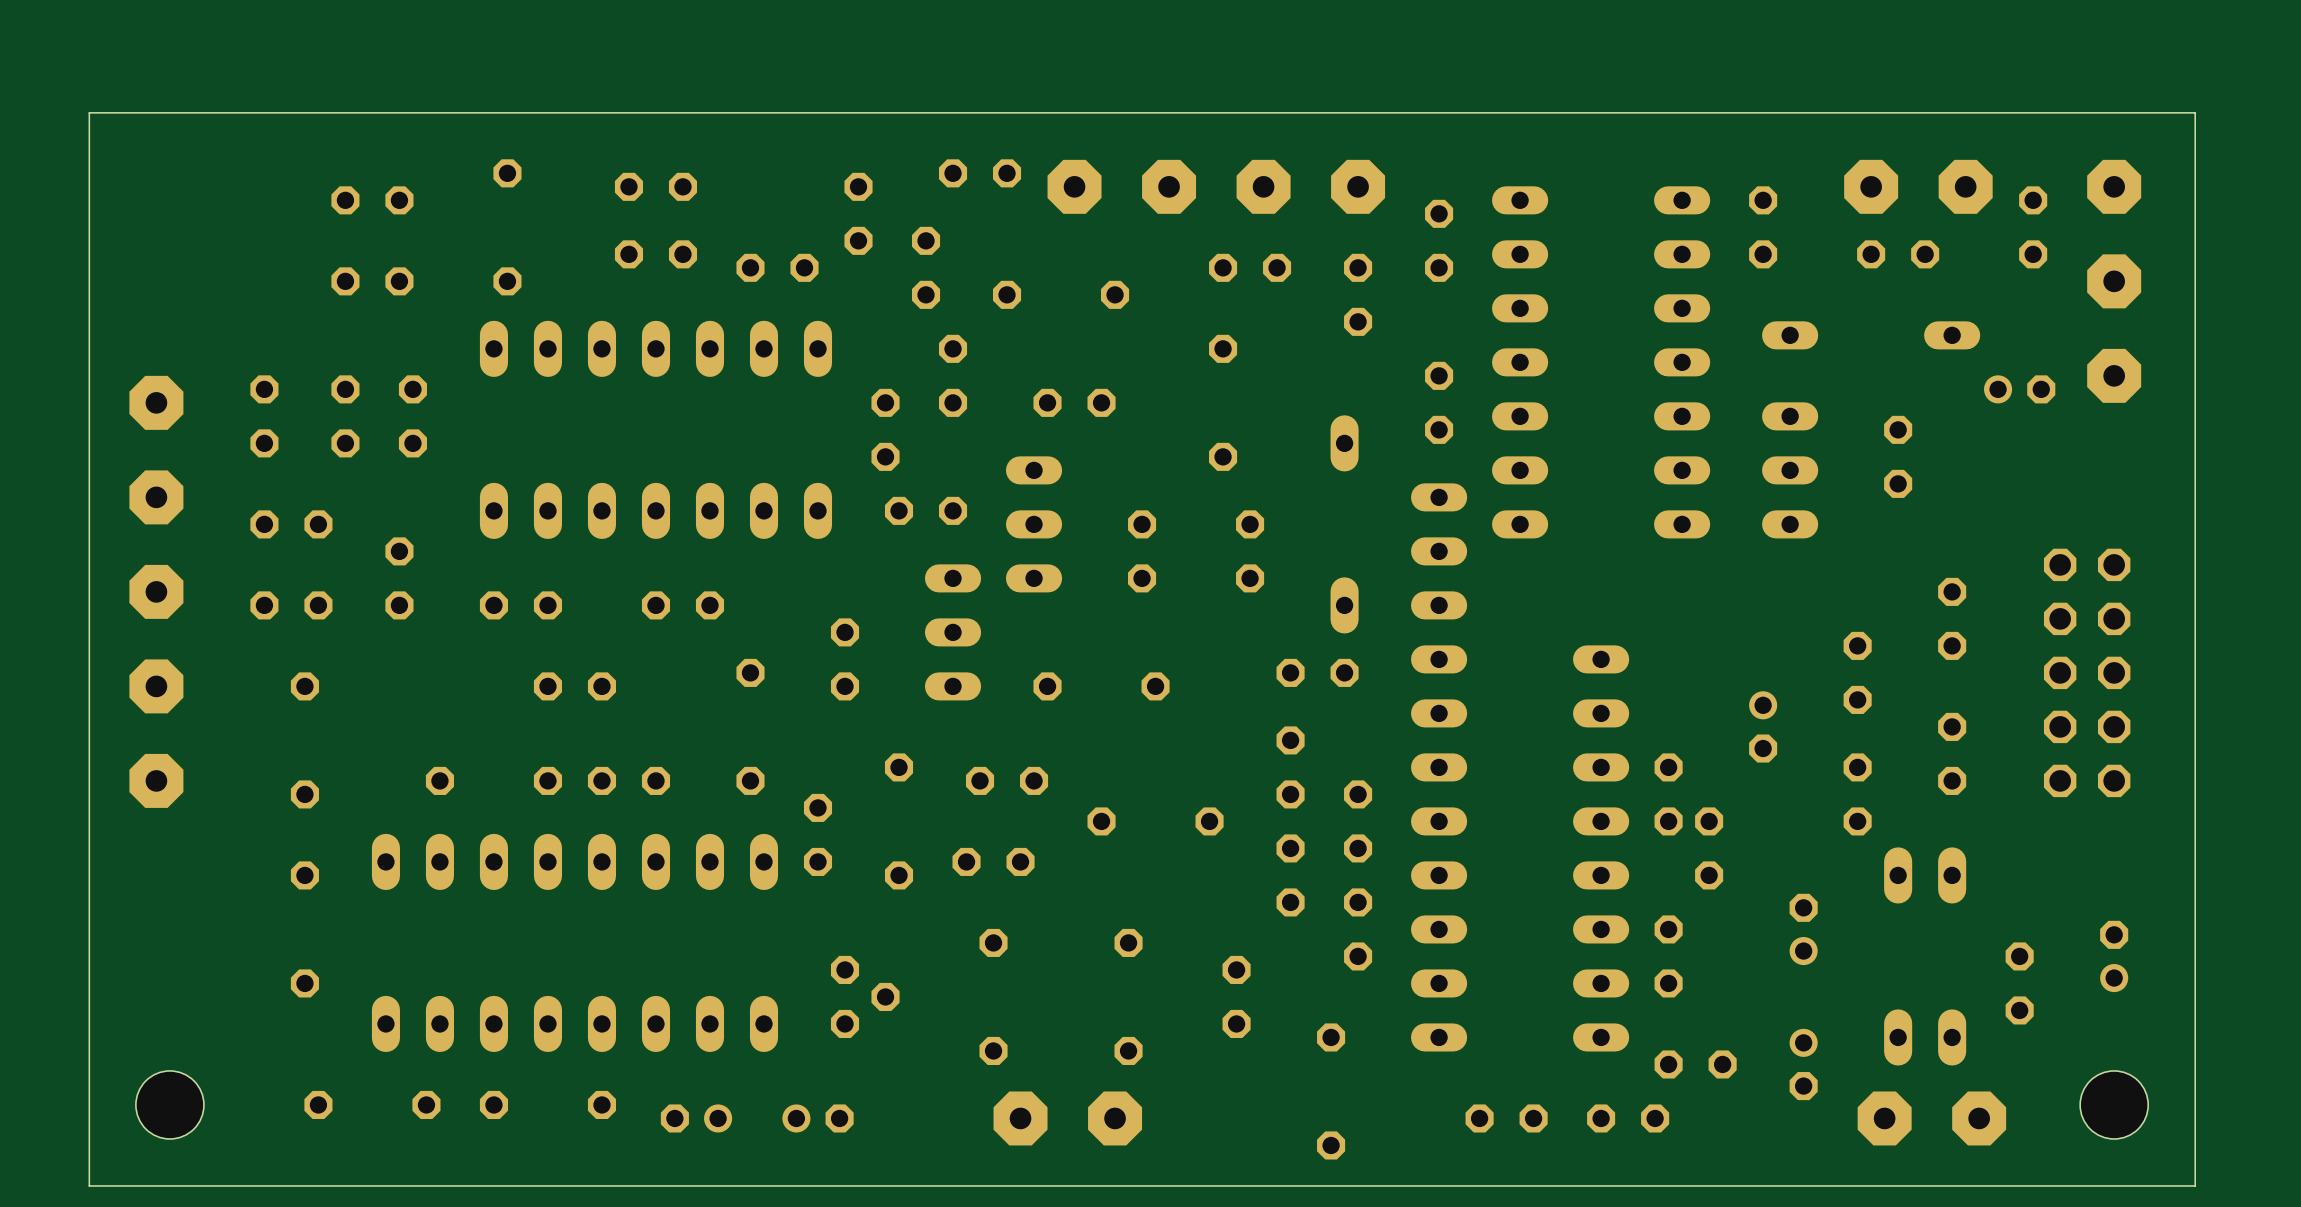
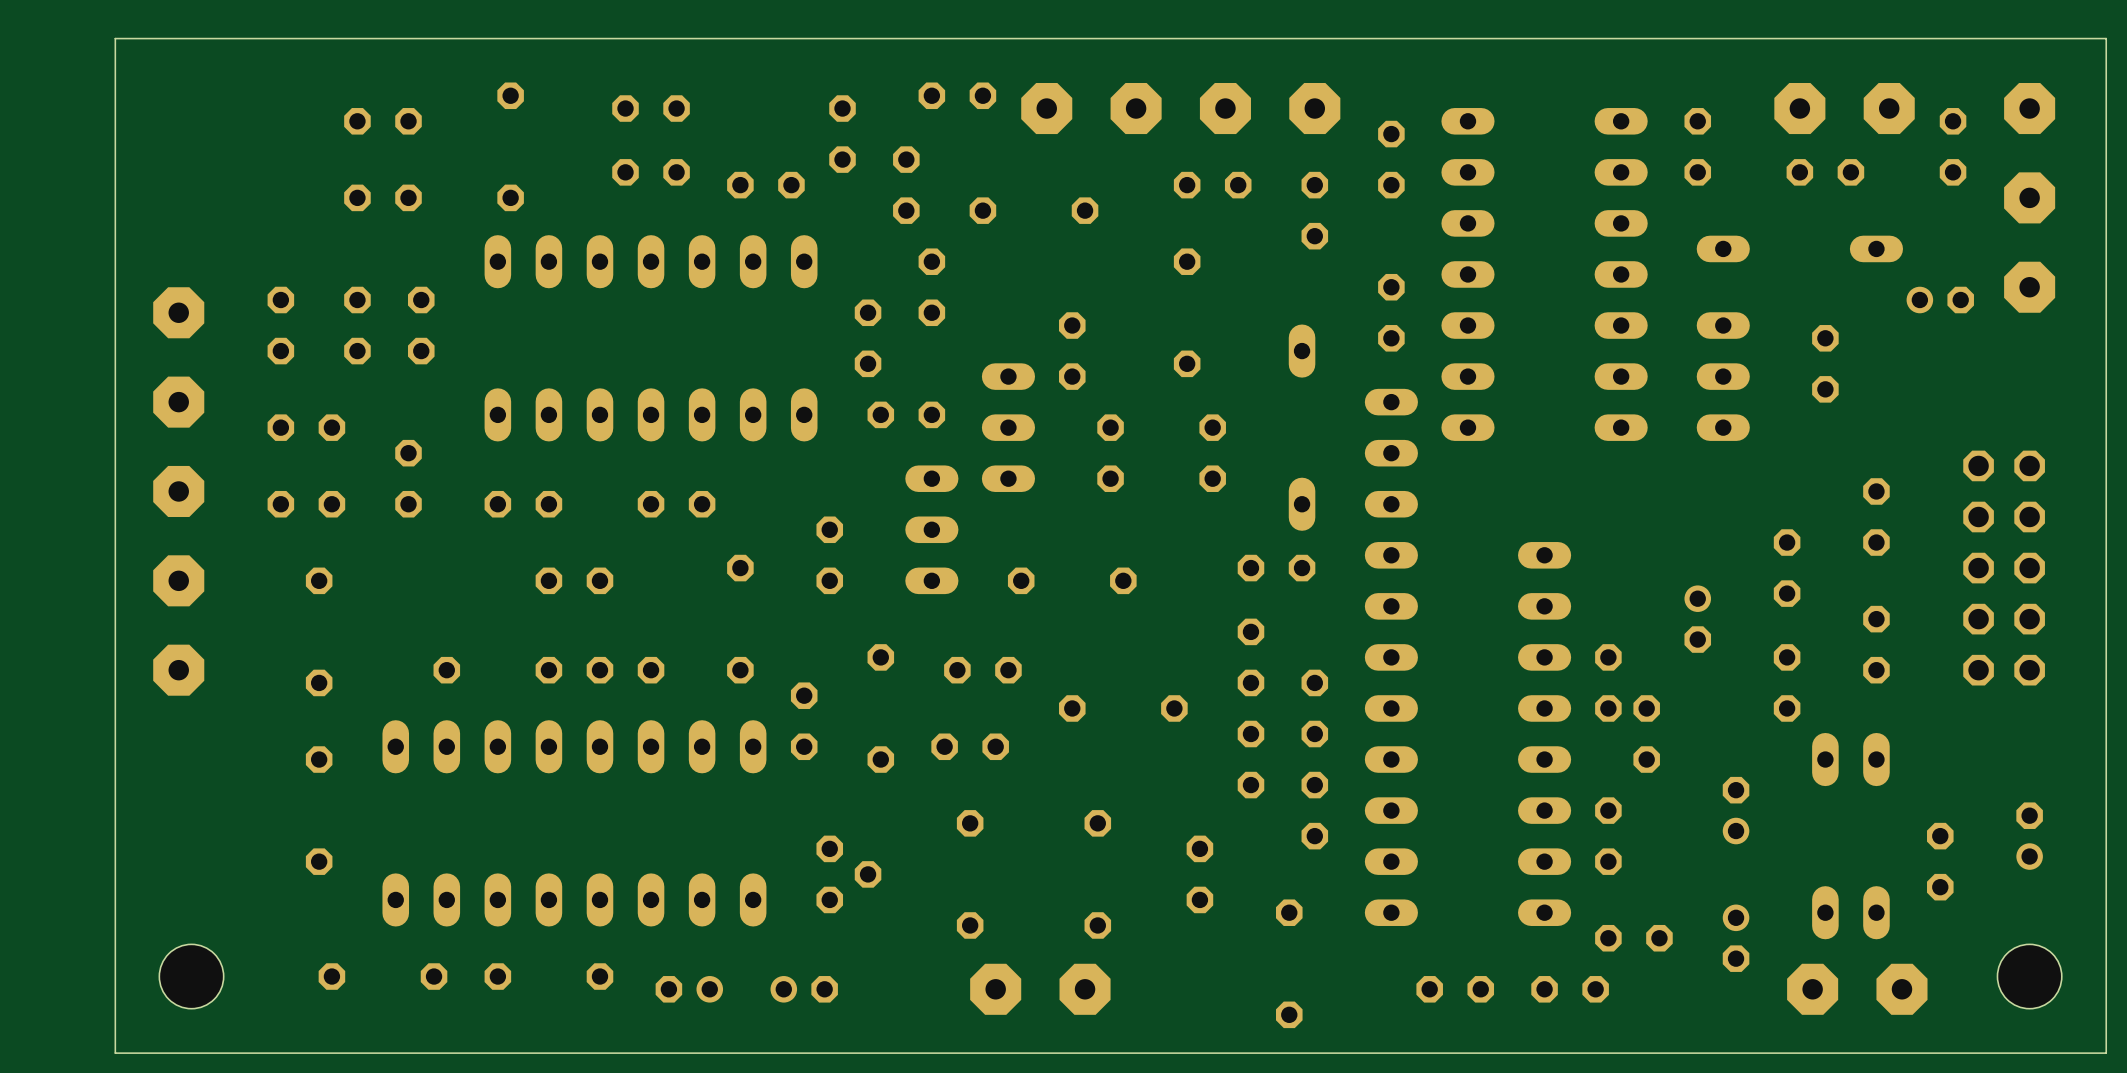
part rotation: 0° (1074, 402) -> 90° clockwise (1072, 351)

